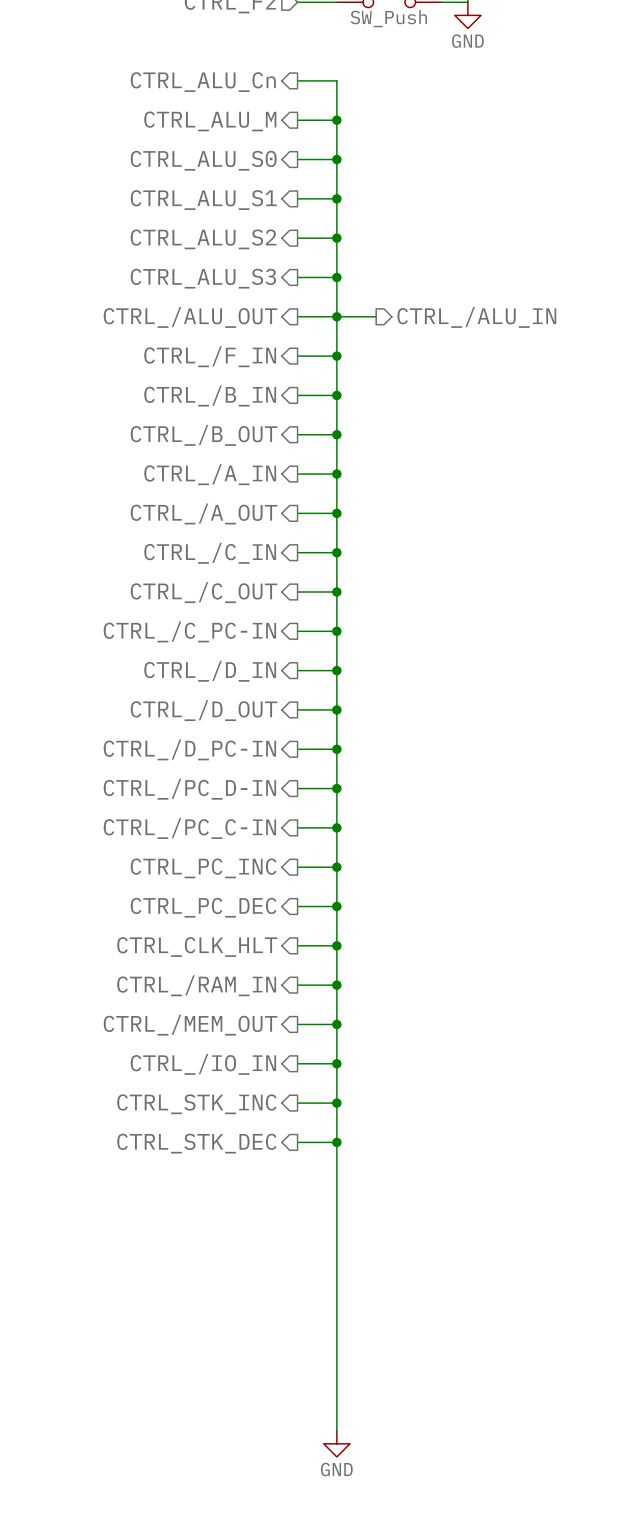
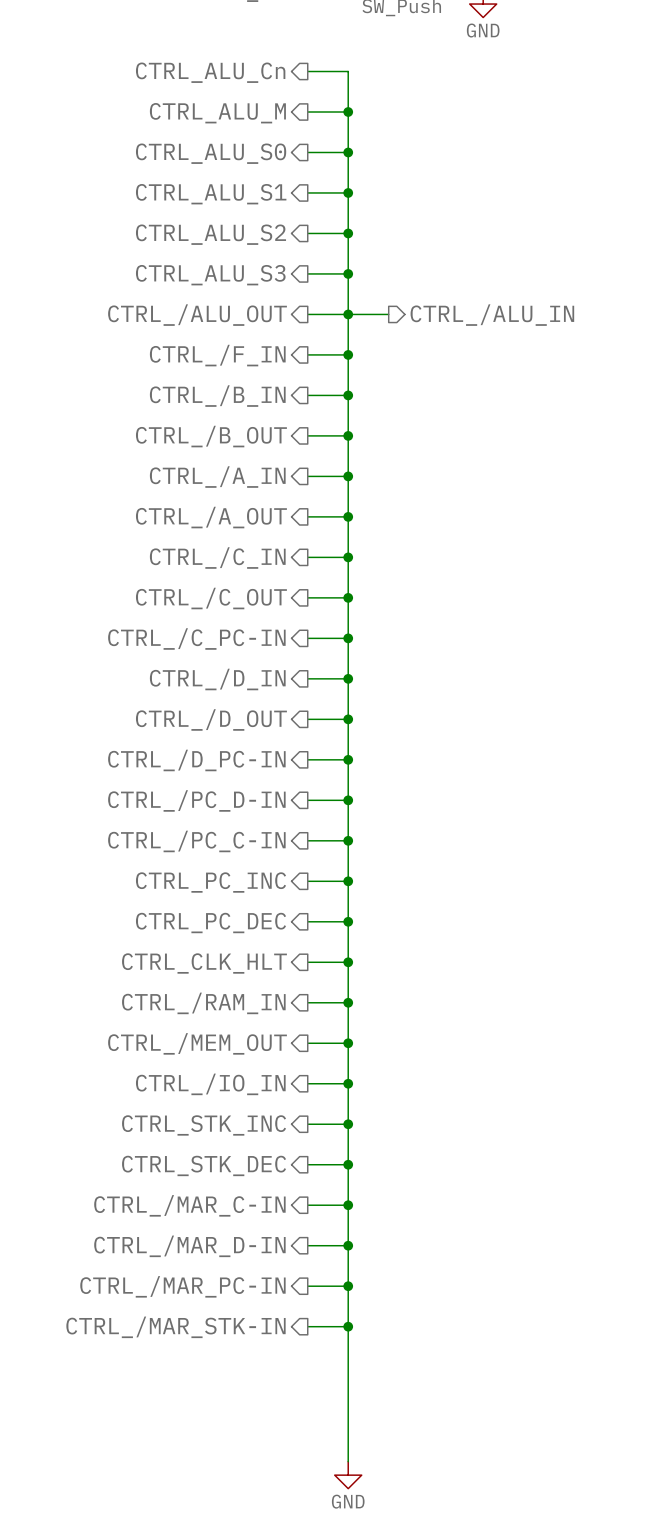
wire: none -> (307, 1205) (348, 1205)
junction: none -> (348, 1205)
hierarchical label: none -> CTRL_/MAR_C-IN (189, 1205)
hierarchical label: none -> CTRL_/MAR_D-IN (189, 1246)
wire: none -> (307, 1245) (348, 1245)
junction: none -> (348, 1245)
hierarchical label: none -> CTRL_/MAR_PC-IN (182, 1286)
wire: none -> (307, 1286) (348, 1286)
junction: none -> (348, 1286)
wire: none -> (307, 1326) (348, 1326)
junction: none -> (348, 1326)
hierarchical label: none -> CTRL_/MAR_STK-IN (175, 1327)

